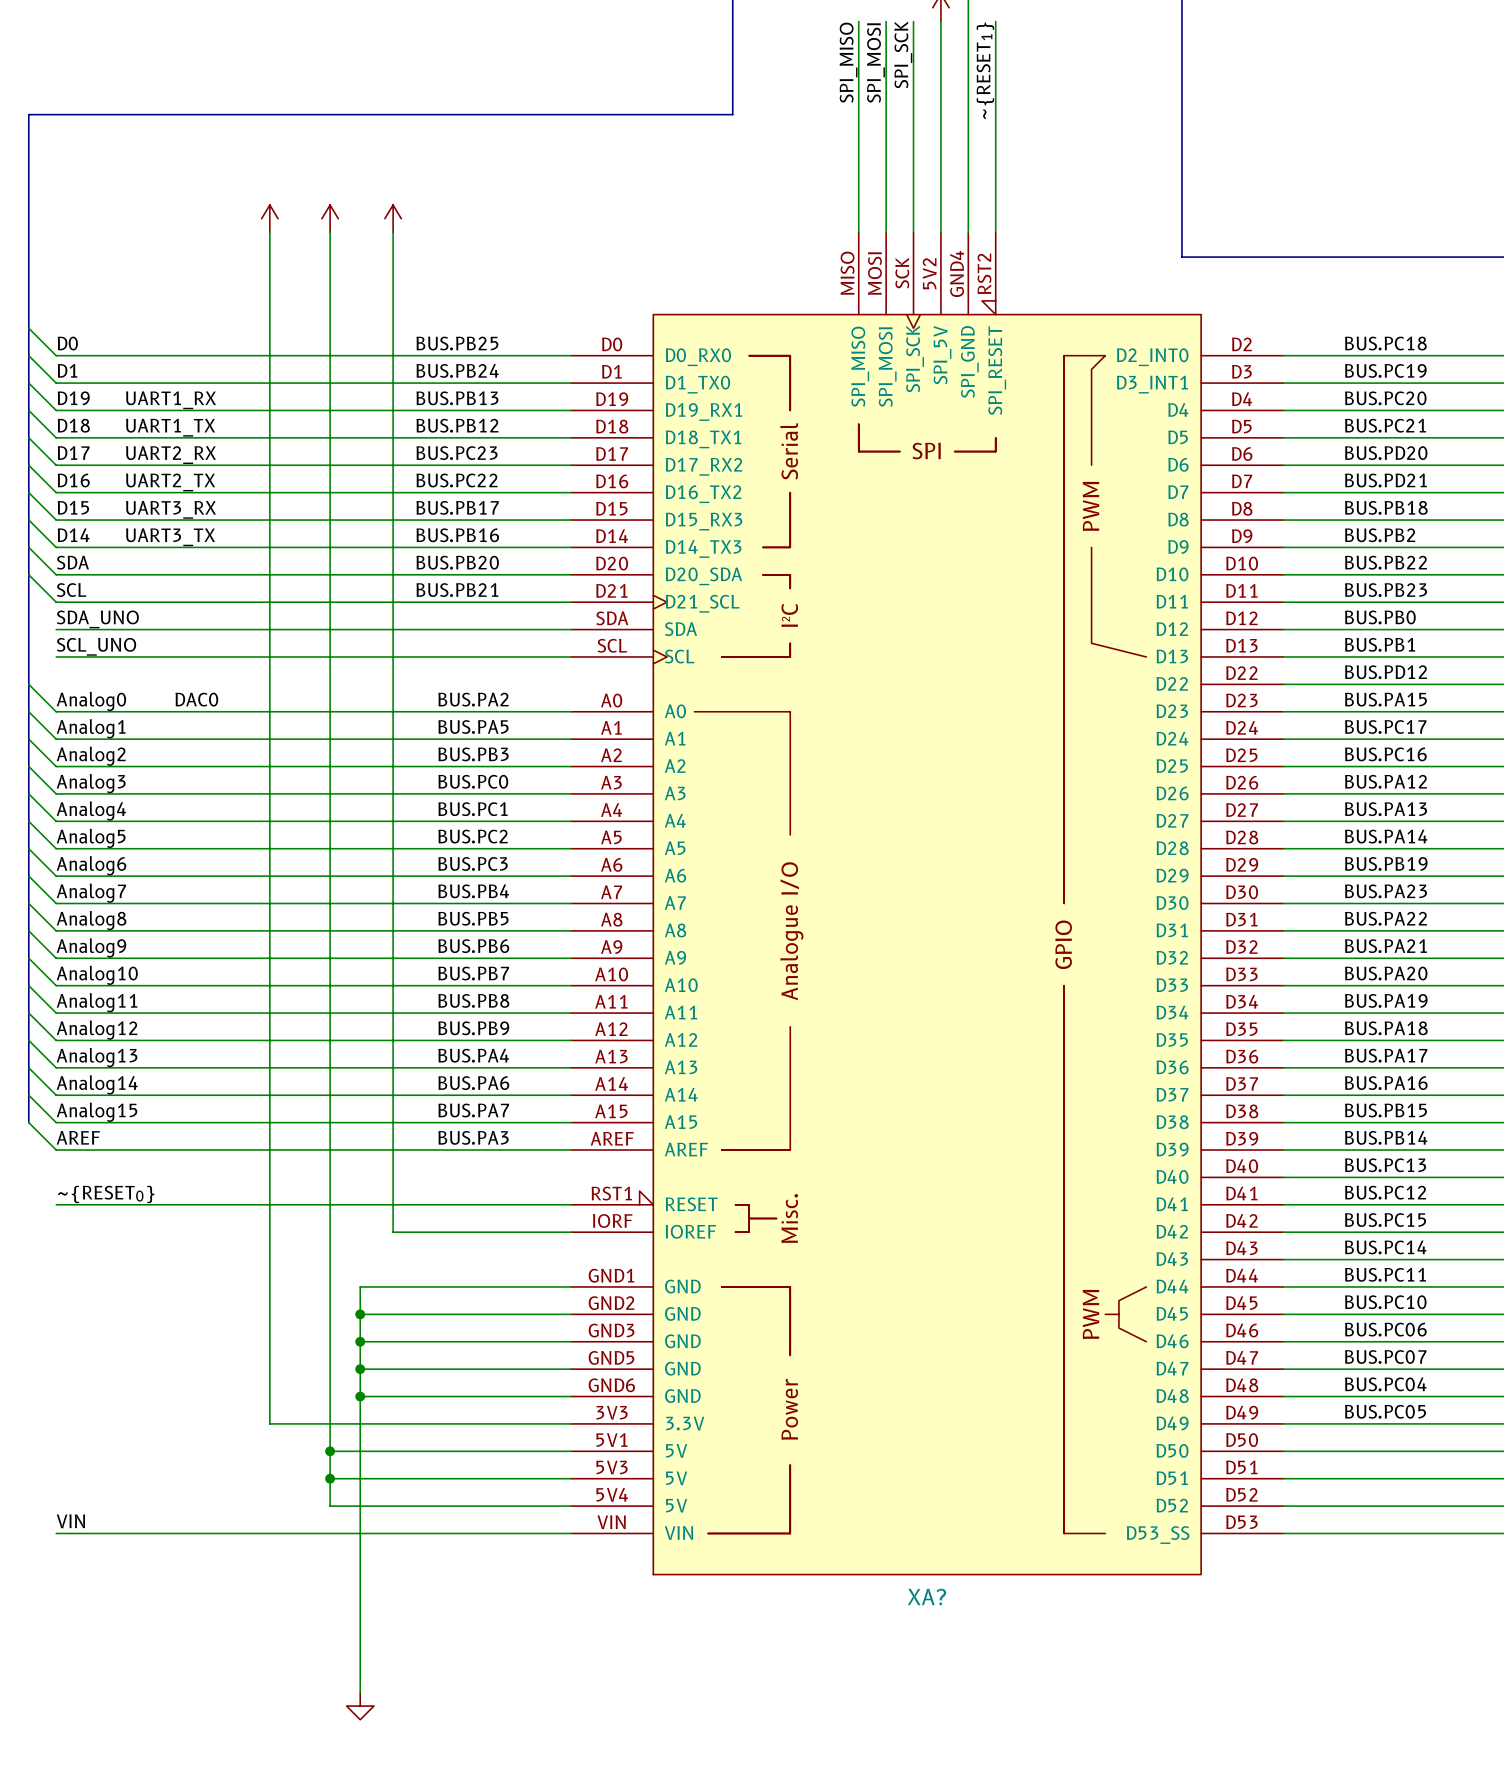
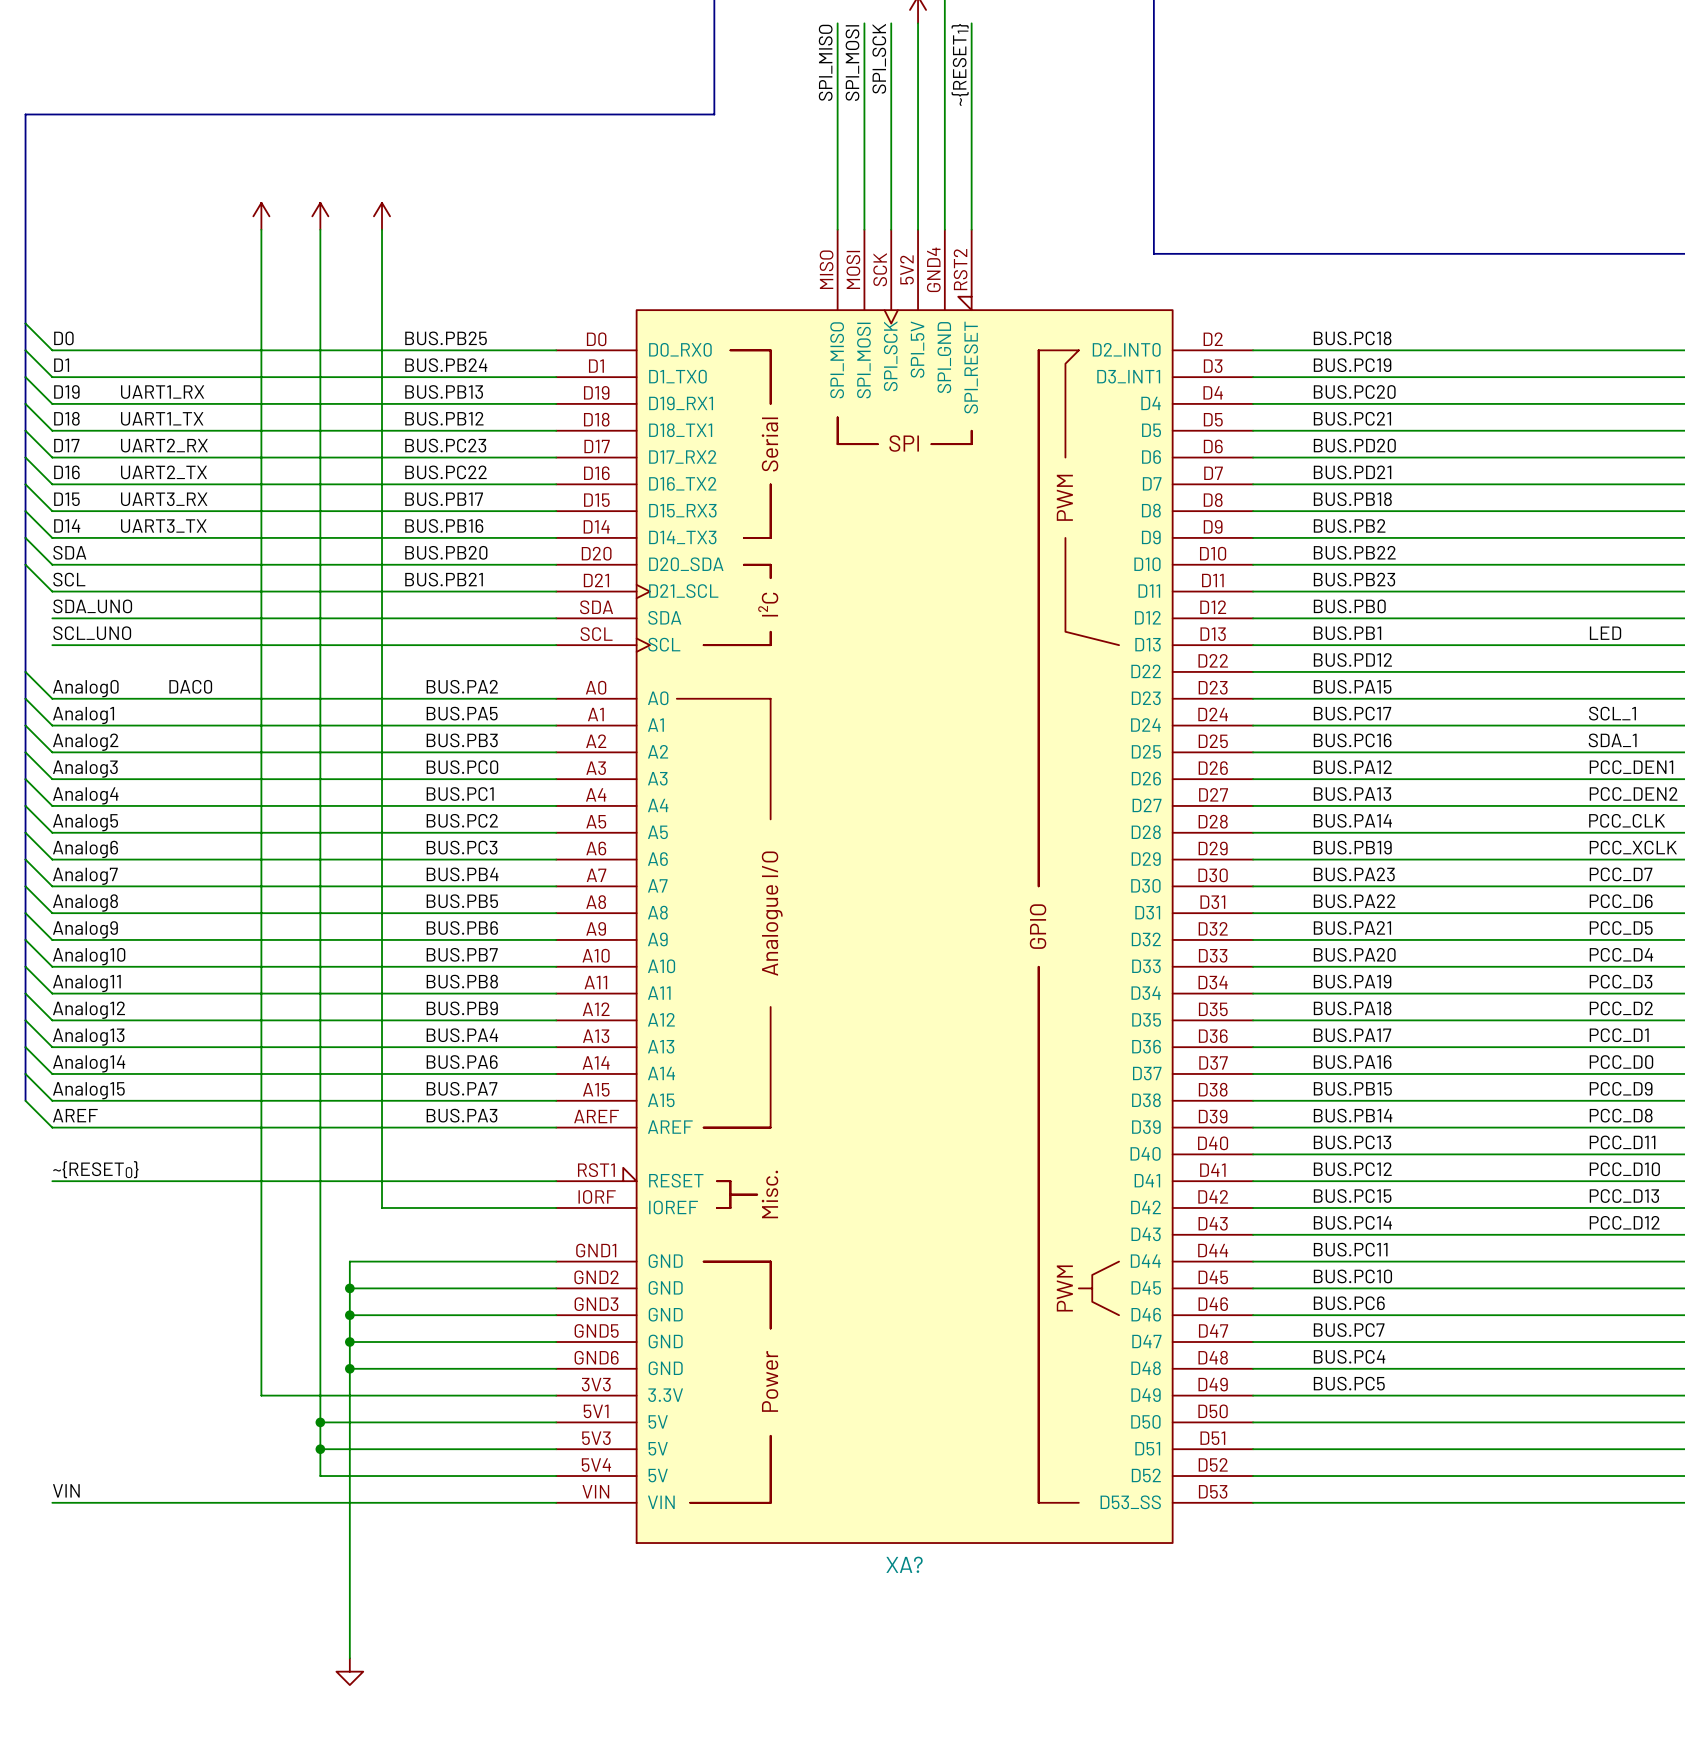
label: BUS.PC06 (1385, 1329) -> BUS.PC6 (1349, 1303)
label: BUS.PC07 (1385, 1357) -> BUS.PC7 (1349, 1330)
label: BUS.PC04 (1385, 1384) -> BUS.PC4 (1349, 1356)
label: BUS.PC05 (1385, 1411) -> BUS.PC5 (1349, 1383)

